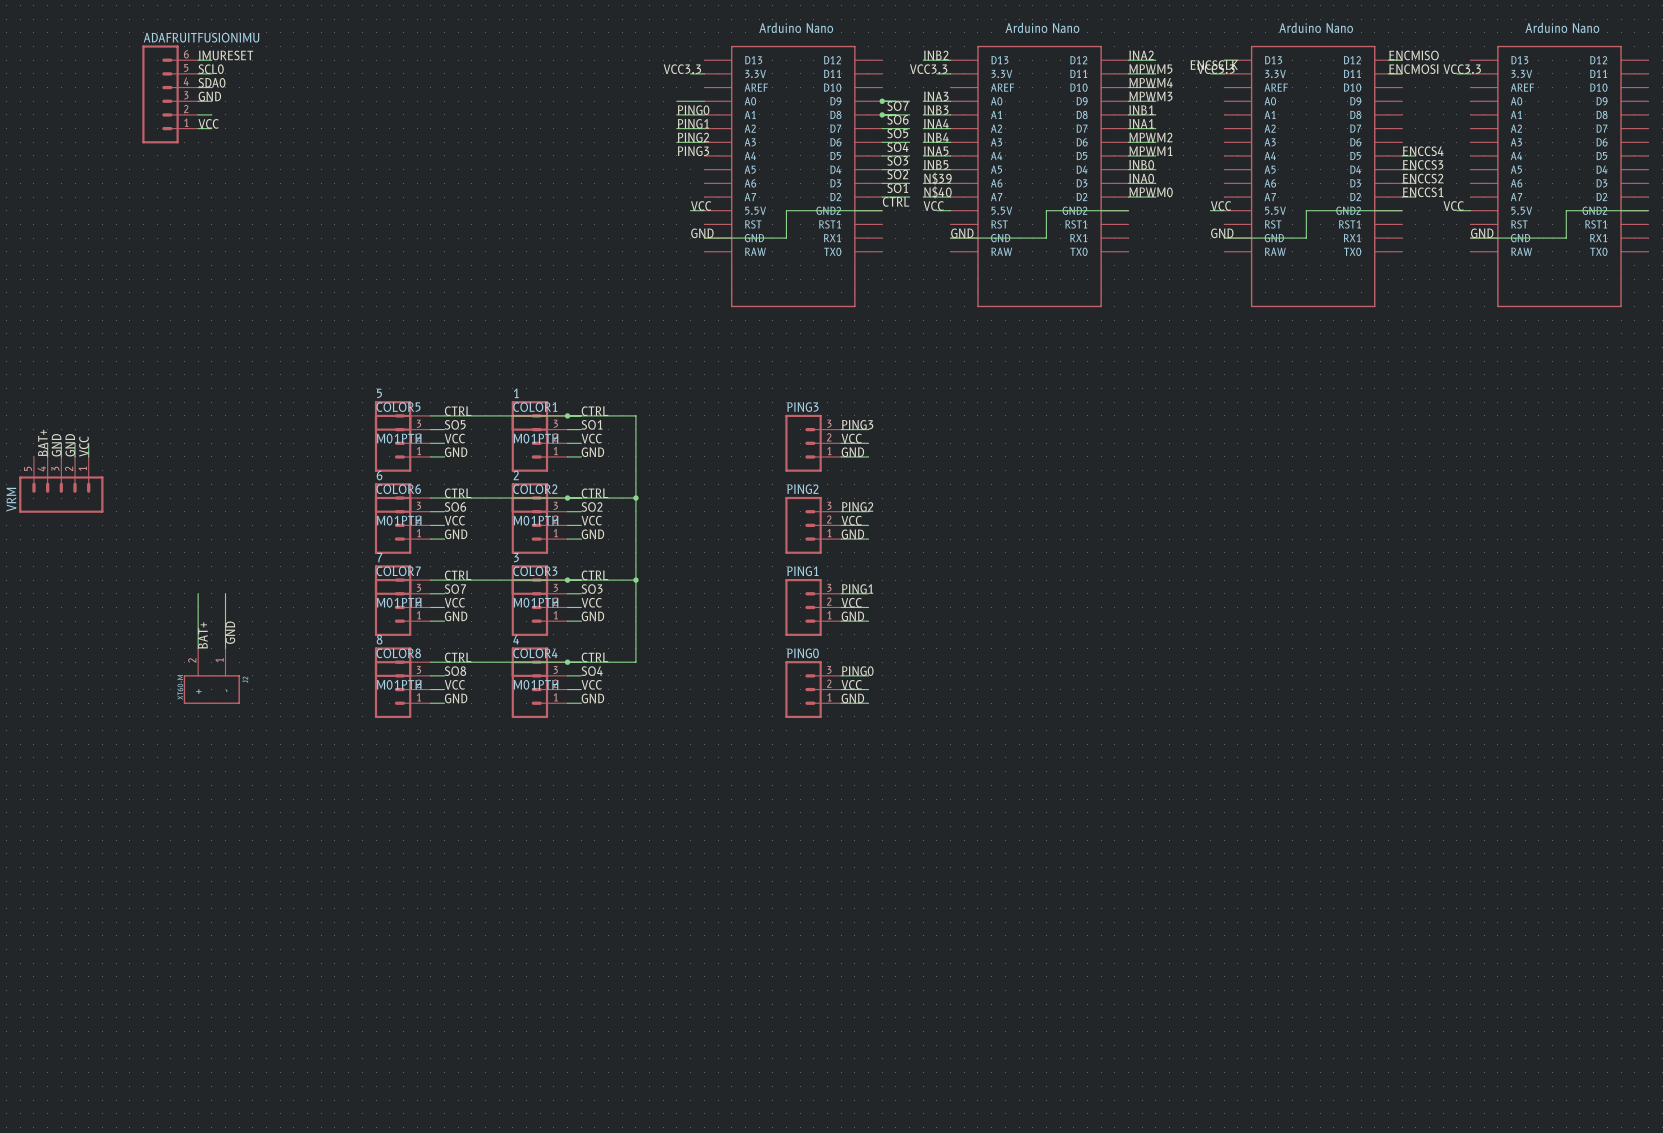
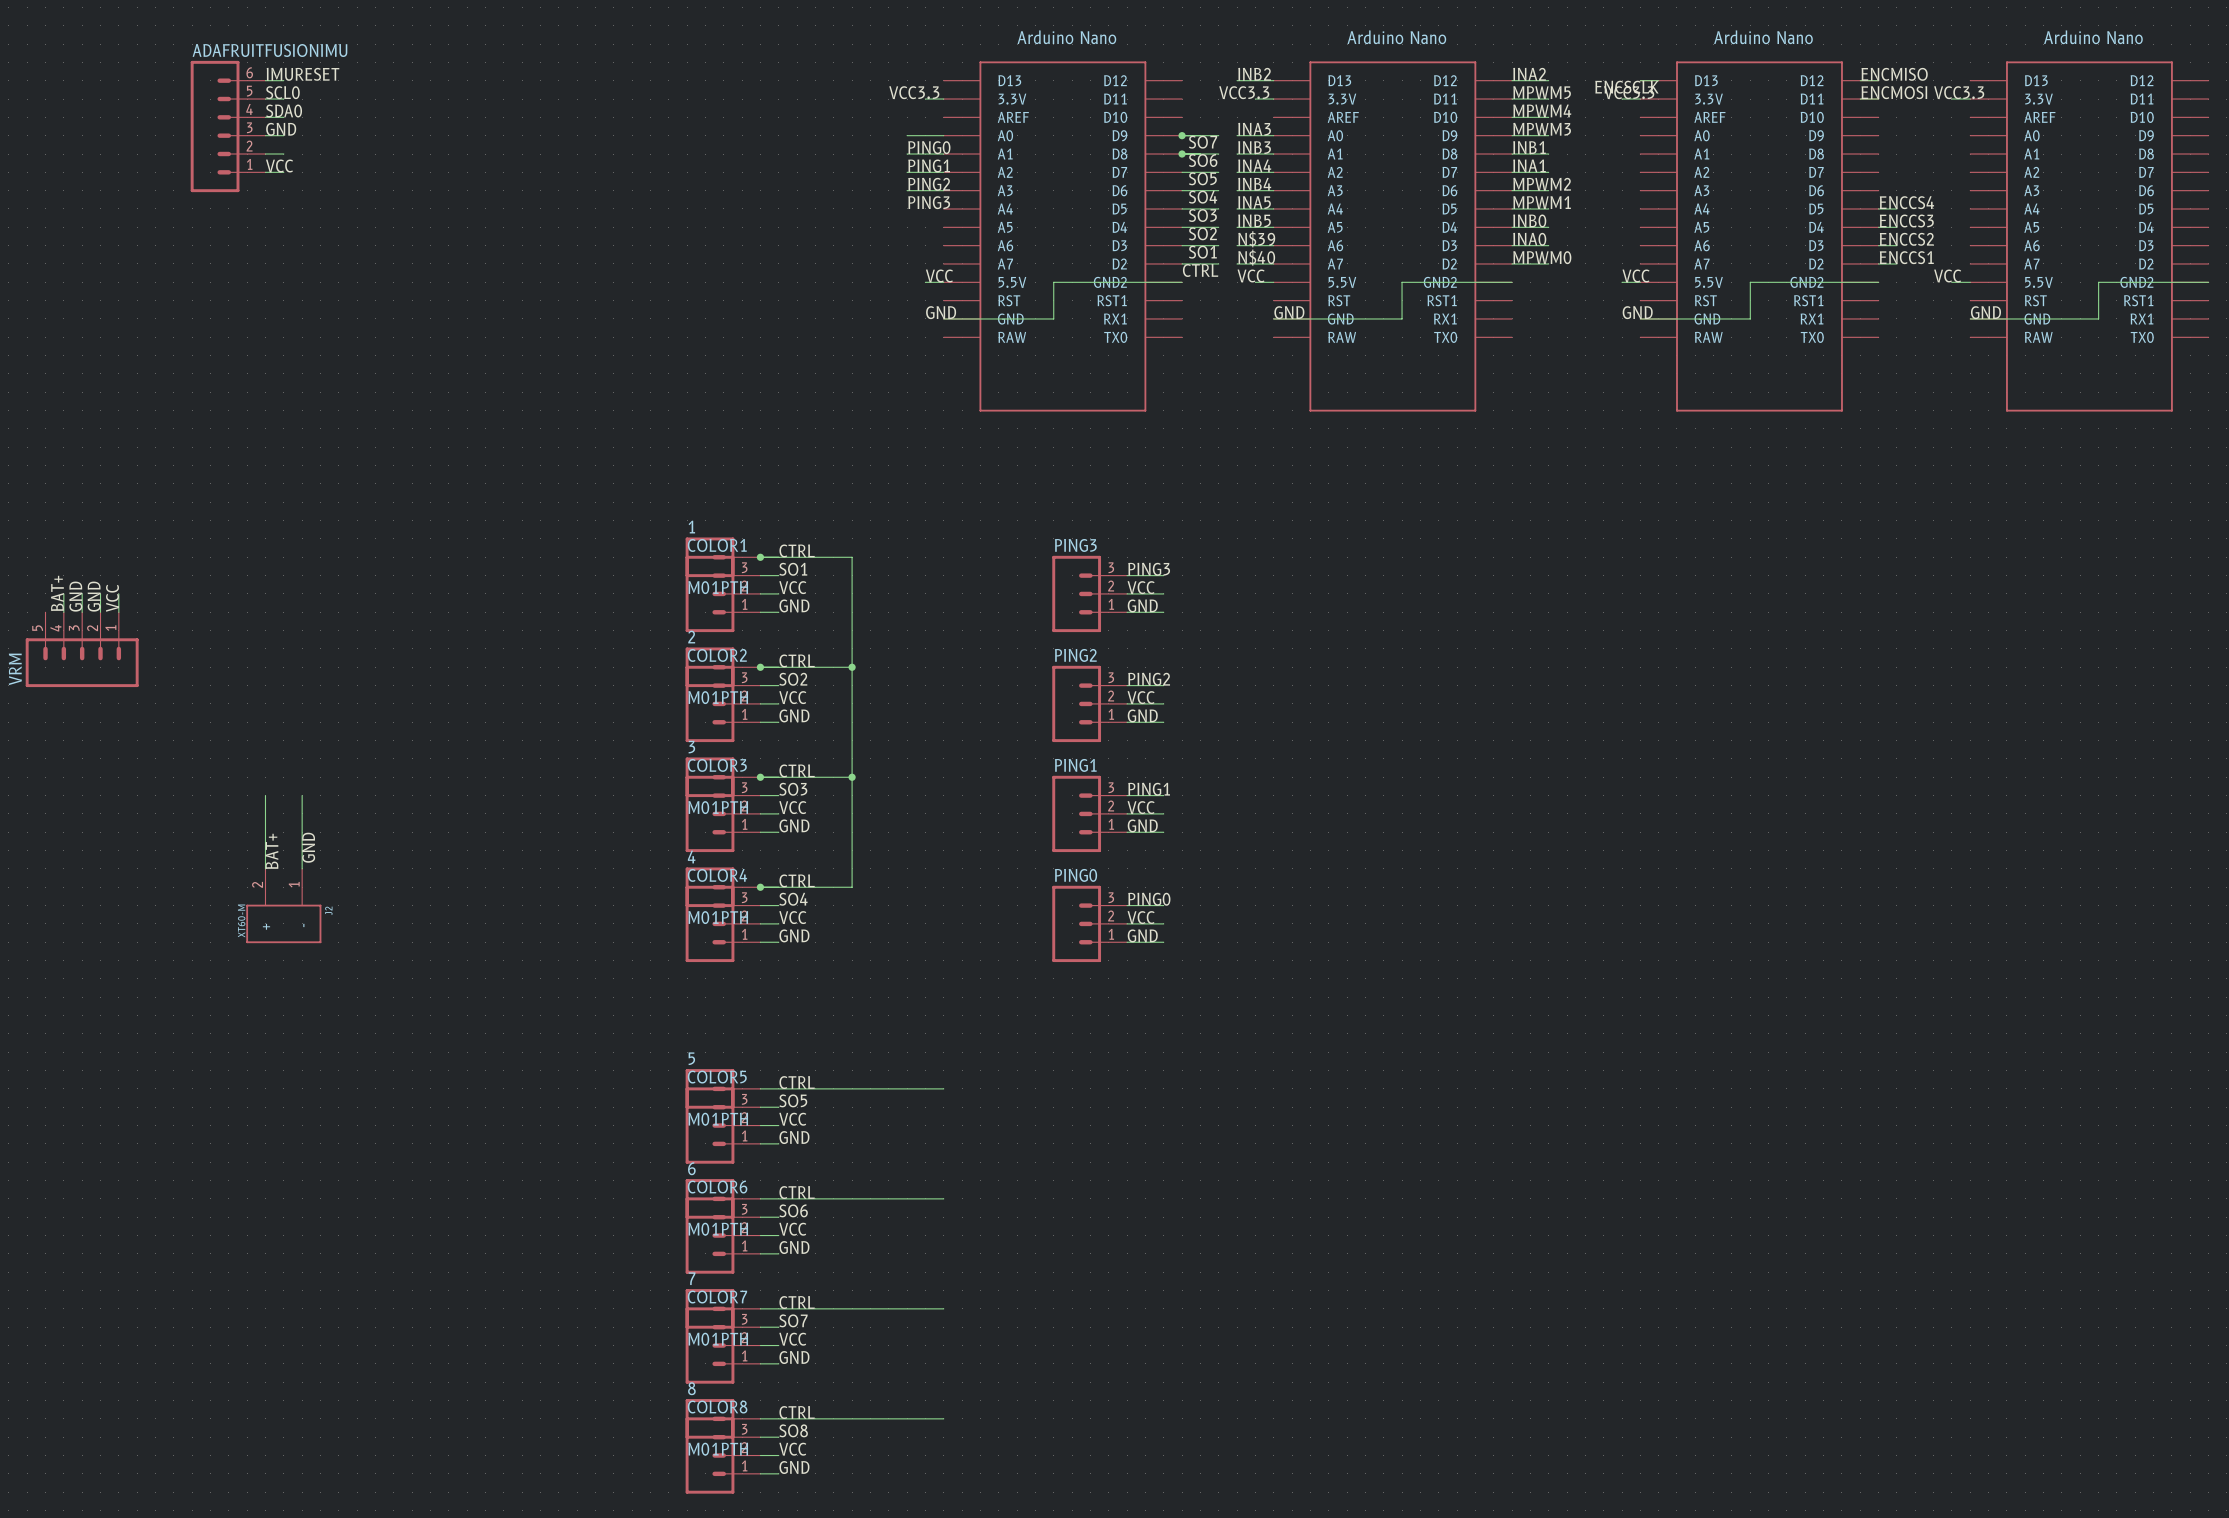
label: CTRL (458, 411) -> none
5 position: (402, 415) -> (723, 1088)
wire: (430, 415) (567, 415) -> none
label: SO5 (455, 424) -> none
wire: (430, 429) (444, 429) -> none
label: VCC (454, 438) -> none
COLOR5 position: (402, 443) -> (723, 1125)
wire: (430, 443) (444, 443) -> none
label: GND (456, 452) -> none
wire: (430, 456) (444, 456) -> none
label: CTRL (458, 493) -> none
6 position: (402, 498) -> (723, 1198)
wire: (430, 498) (567, 498) -> none
label: SO6 (455, 506) -> none
wire: (430, 511) (444, 511) -> none
label: VCC (454, 520) -> none
COLOR6 position: (402, 525) -> (723, 1235)
wire: (430, 525) (444, 525) -> none
label: GND (456, 534) -> none
wire: (430, 539) (444, 539) -> none
label: CTRL (458, 575) -> none
7 position: (402, 580) -> (723, 1308)
wire: (430, 580) (567, 580) -> none
label: SO7 (455, 589) -> none
wire: (430, 593) (444, 593) -> none
label: VCC (454, 602) -> none
COLOR7 position: (402, 607) -> (723, 1345)
wire: (430, 607) (444, 607) -> none
label: GND (456, 616) -> none
wire: (430, 621) (444, 621) -> none
label: CTRL (458, 657) -> none
8 position: (402, 662) -> (723, 1418)
wire: (430, 662) (567, 662) -> none
label: SO8 (455, 671) -> none
wire: (430, 675) (444, 675) -> none
label: VCC (454, 684) -> none
COLOR8 position: (402, 689) -> (723, 1455)
wire: (430, 689) (444, 689) -> none
label: GND (456, 698) -> none
wire: (430, 703) (444, 703) -> none
label: none -> CTRL (797, 1082)
wire: none -> (760, 1088) (943, 1088)
label: none -> SO5 (793, 1100)
wire: none -> (760, 1107) (778, 1107)
label: none -> VCC (792, 1119)
wire: none -> (760, 1125) (778, 1125)
label: none -> GND (794, 1137)
wire: none -> (760, 1143) (778, 1143)
label: none -> CTRL (797, 1192)
wire: none -> (760, 1198) (943, 1198)
label: none -> SO6 (793, 1210)
wire: none -> (760, 1217) (778, 1217)
label: none -> VCC (792, 1229)
wire: none -> (760, 1235) (778, 1235)
label: none -> GND (794, 1247)
wire: none -> (760, 1253) (778, 1253)
label: none -> CTRL (797, 1302)
wire: none -> (760, 1308) (943, 1308)
label: none -> SO7 (793, 1320)
wire: none -> (760, 1327) (778, 1327)
label: none -> VCC (792, 1339)
wire: none -> (760, 1345) (778, 1345)
label: none -> GND (794, 1357)
wire: none -> (760, 1363) (778, 1363)
label: none -> CTRL (797, 1412)
wire: none -> (760, 1418) (943, 1418)
label: none -> SO8 (793, 1430)
wire: none -> (760, 1437) (778, 1437)
label: none -> VCC (792, 1449)
wire: none -> (760, 1455) (778, 1455)
label: none -> GND (794, 1467)
wire: none -> (760, 1473) (778, 1473)

